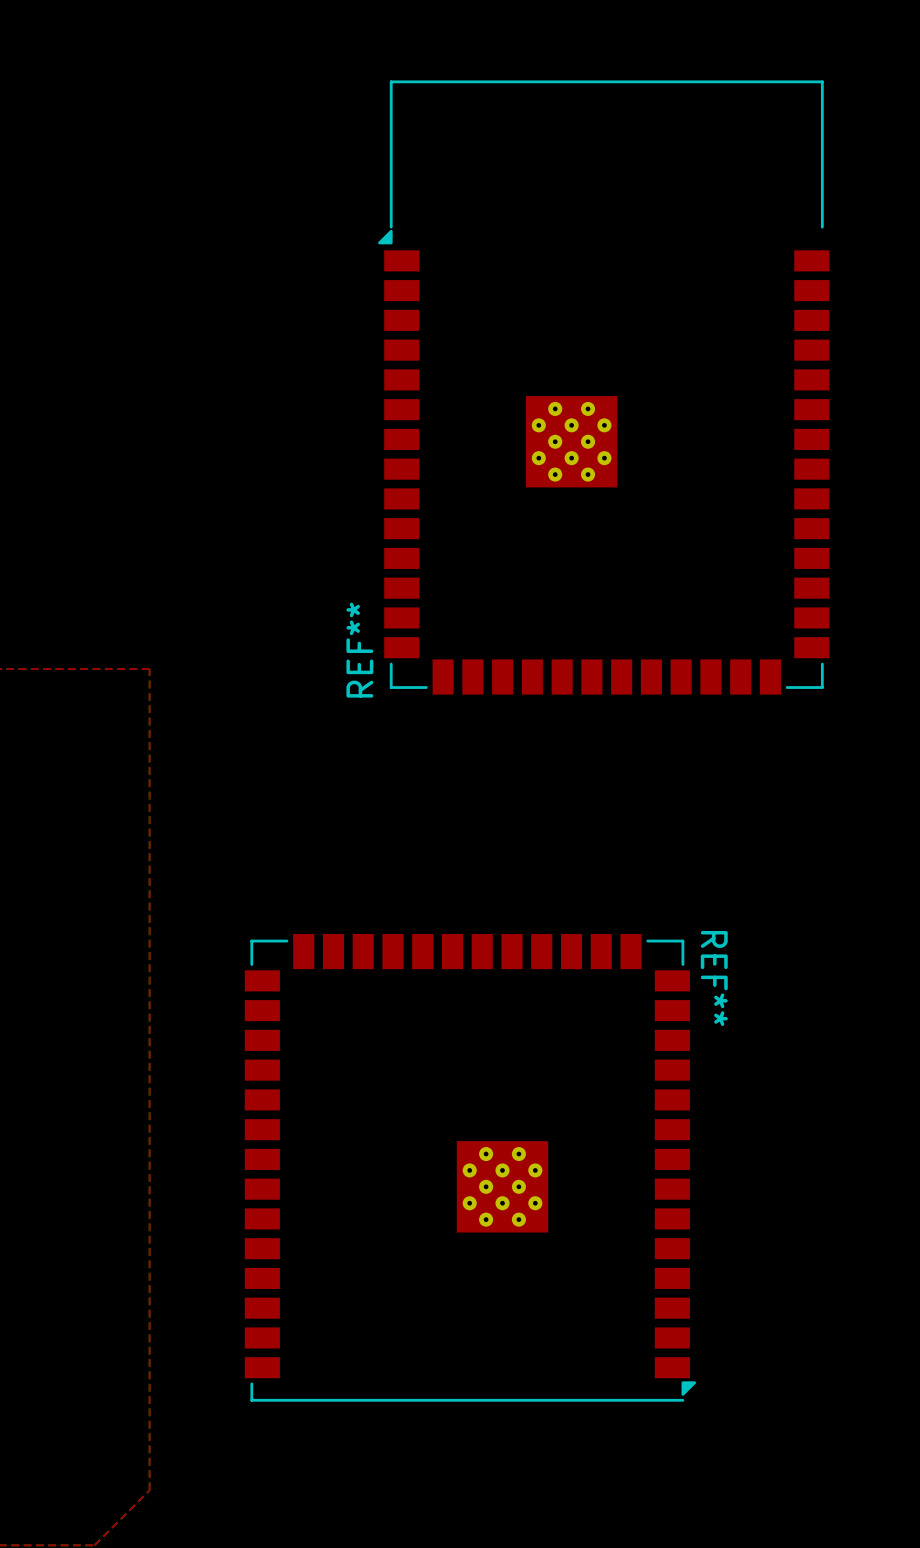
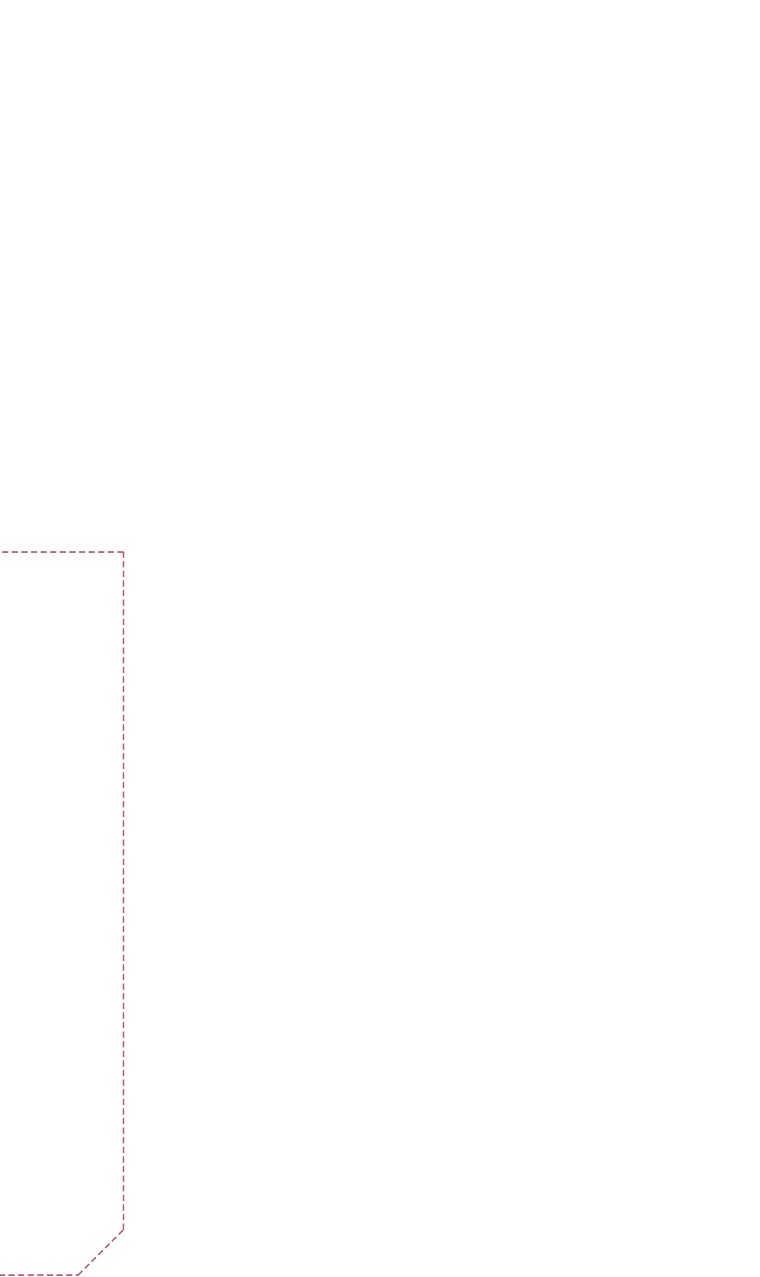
REF**: (603, 387) -> none
REF**: (470, 1167) -> none

